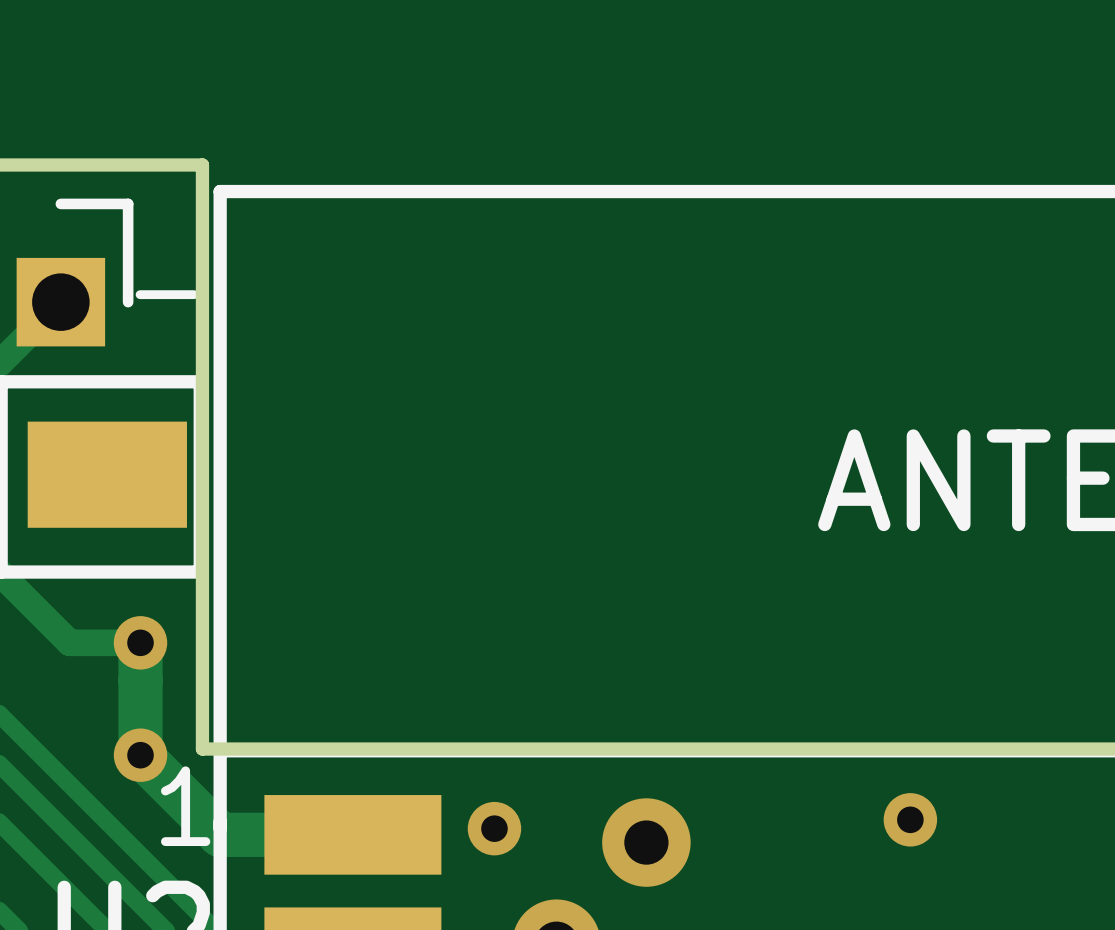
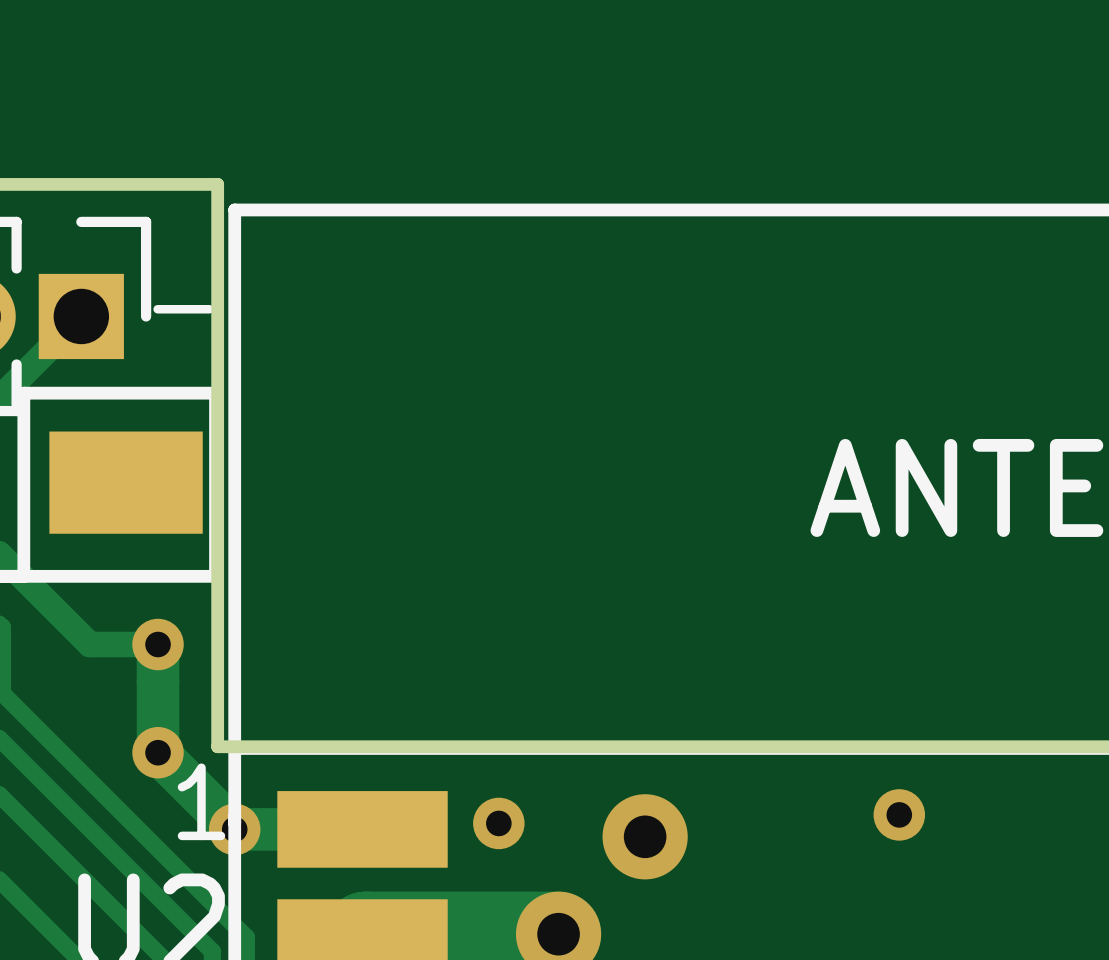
via: none -> (234, 829)

